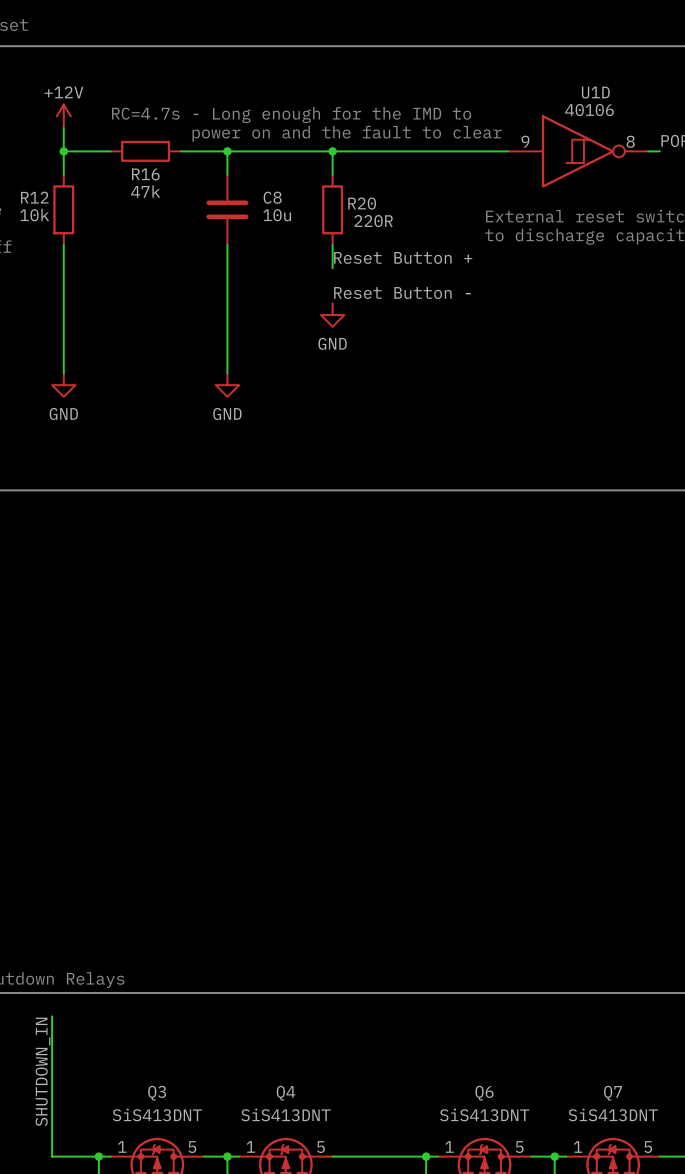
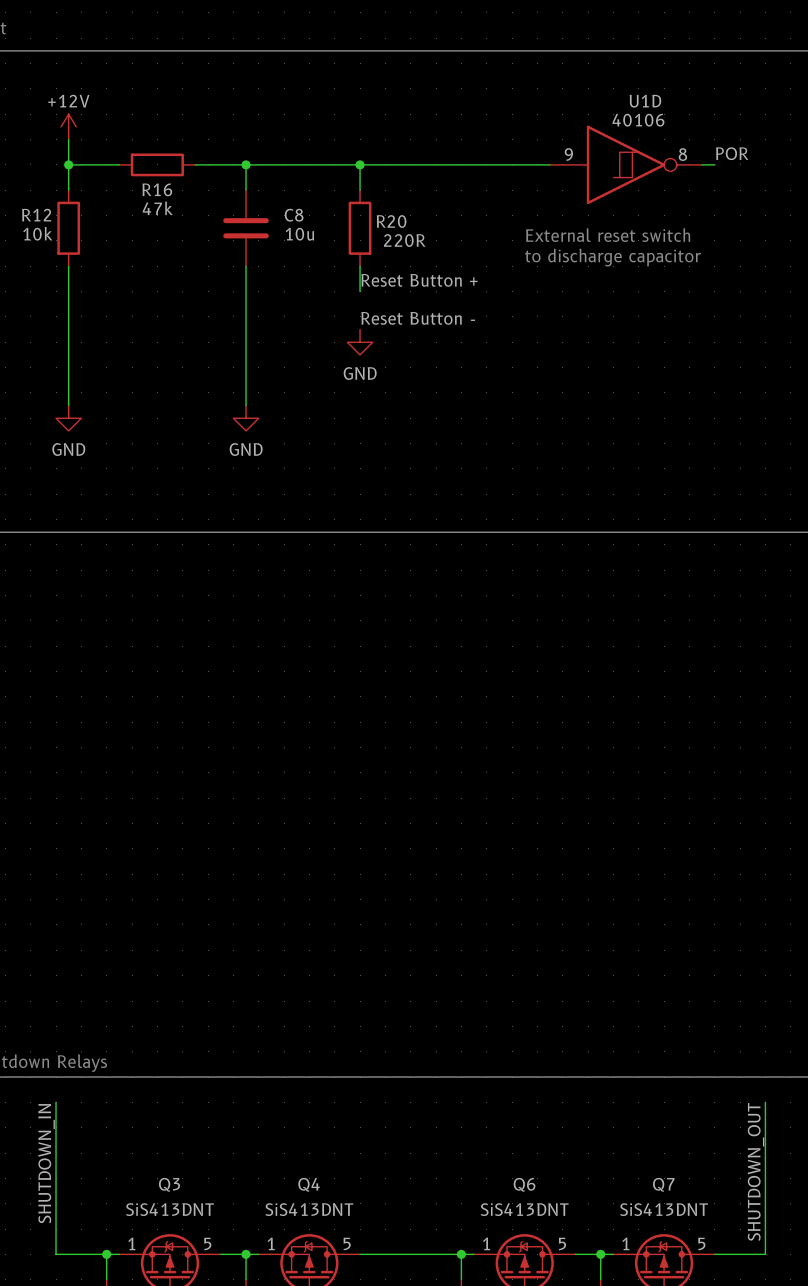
text: RC=4.7s - Long enough for the IMD to (291, 115) -> none
text: power on and the fault to clear (347, 133) -> none

